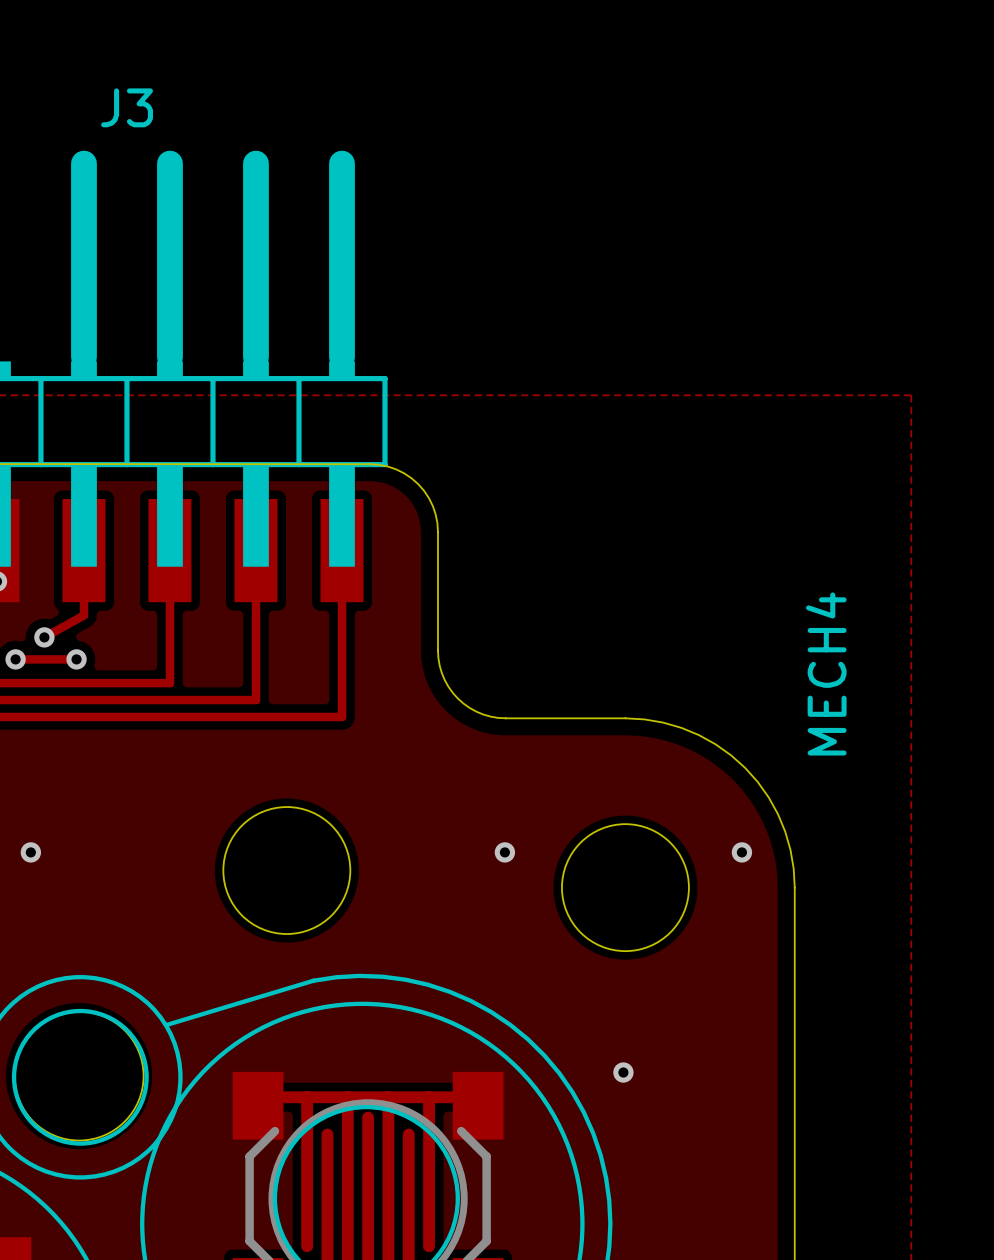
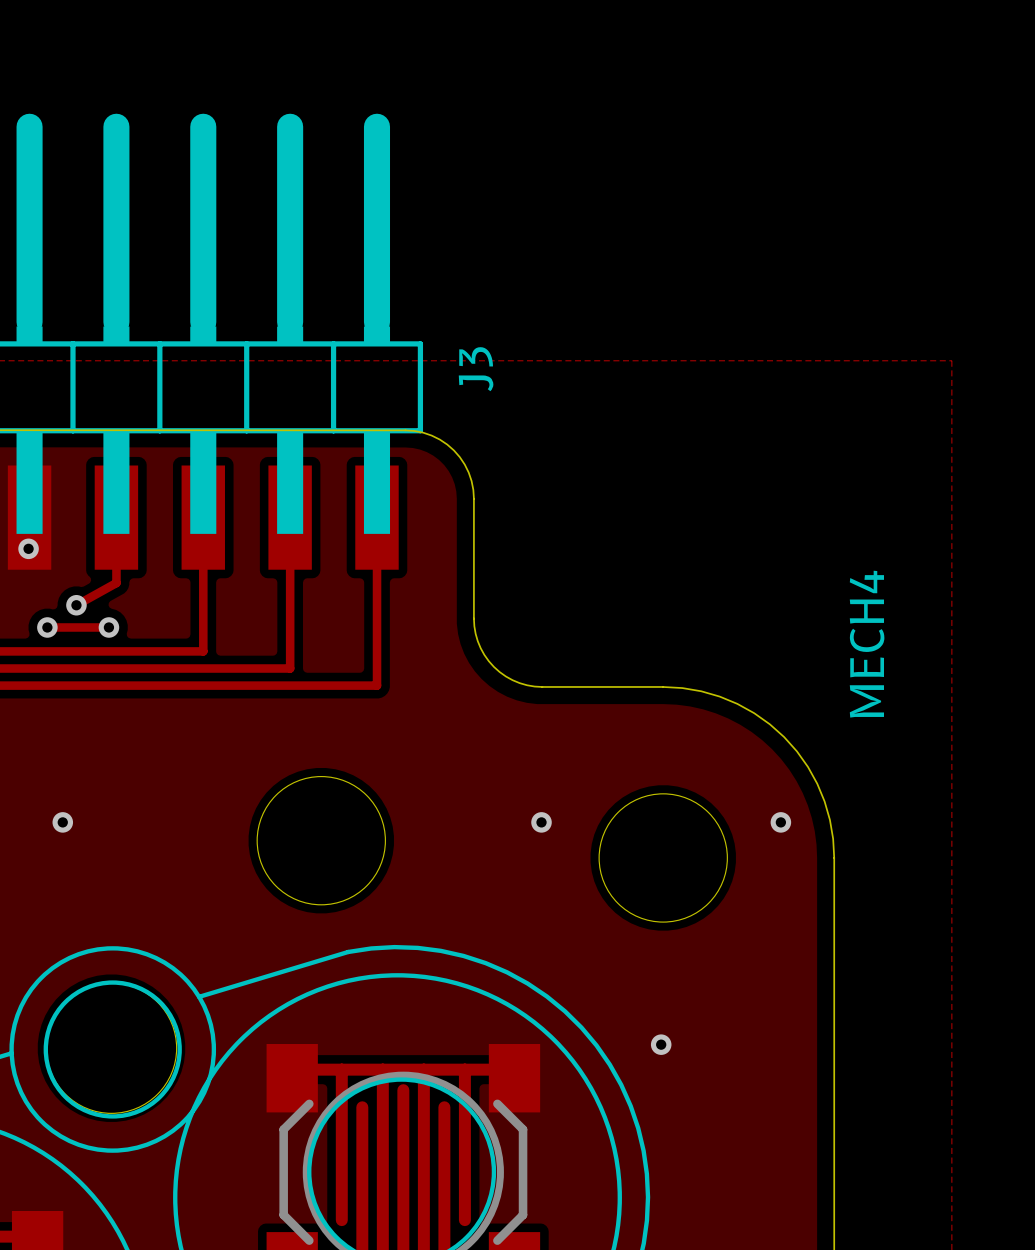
J3 name rotation: 0° (127, 107) -> 90° counterclockwise (476, 369)
J3 name position: J3 (127, 107) -> J3 (476, 369)

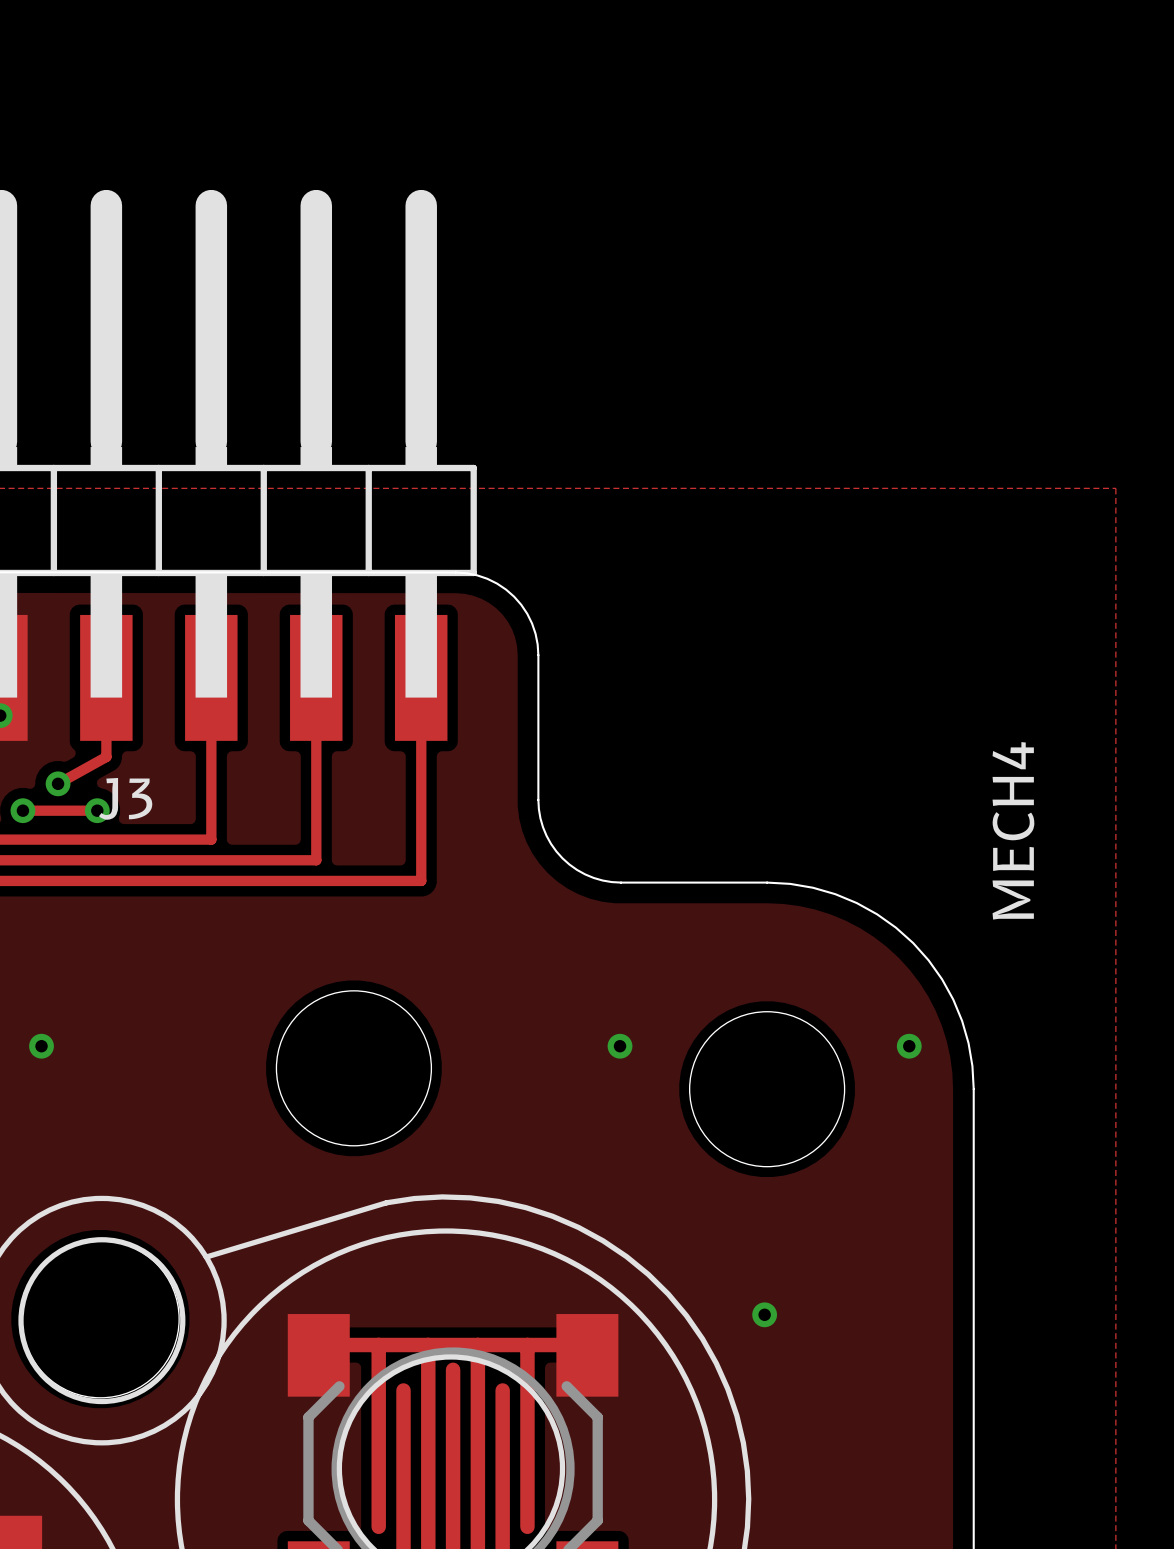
J3 name rotation: 0° (476, 369) -> 90° clockwise (125, 798)
J3 name position: J3 (476, 369) -> J3 (125, 798)

